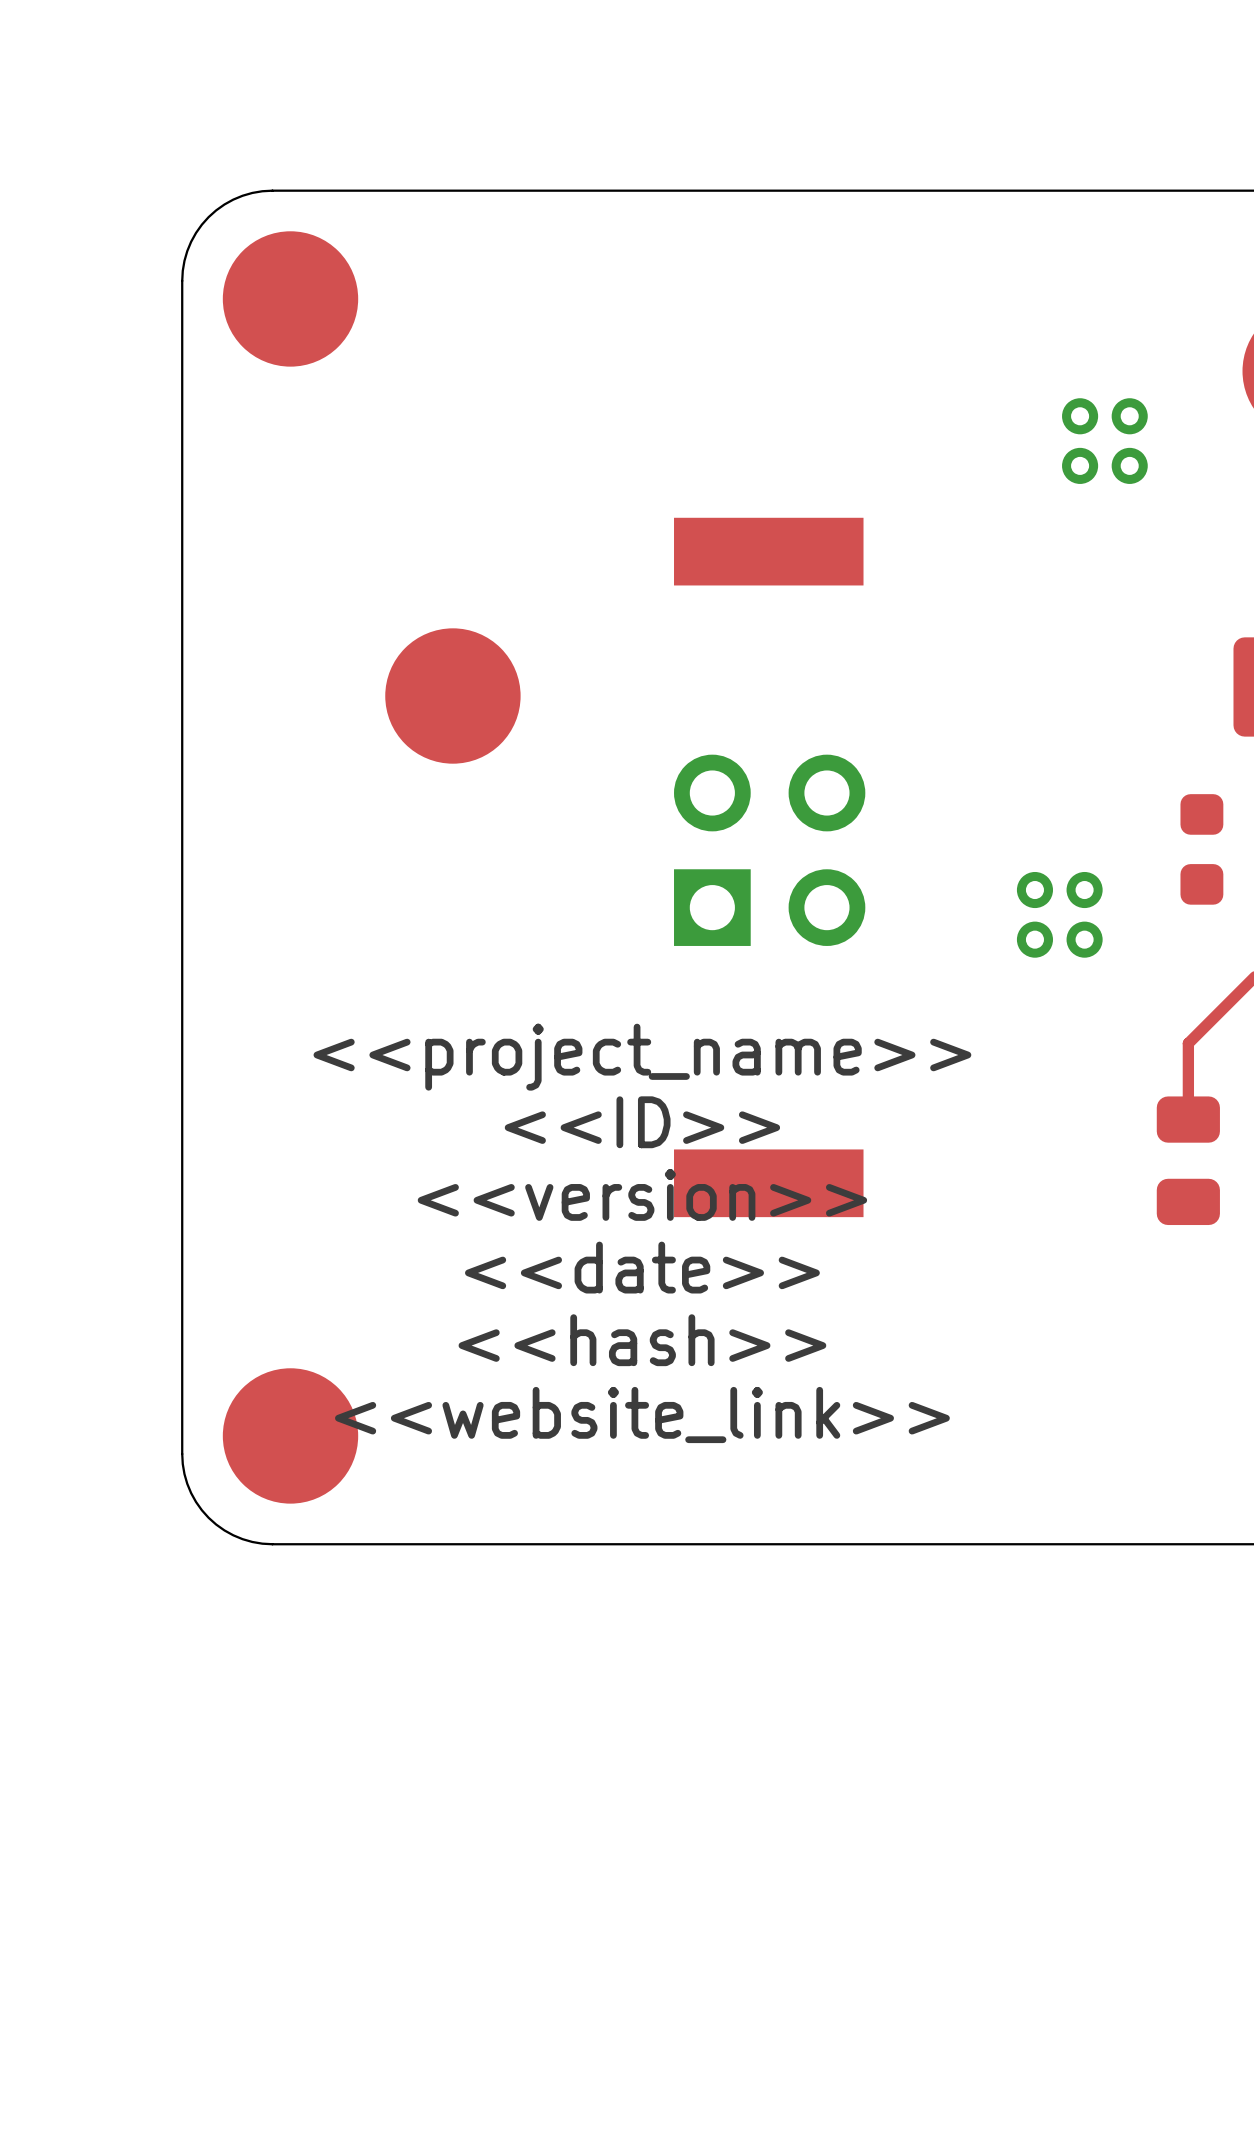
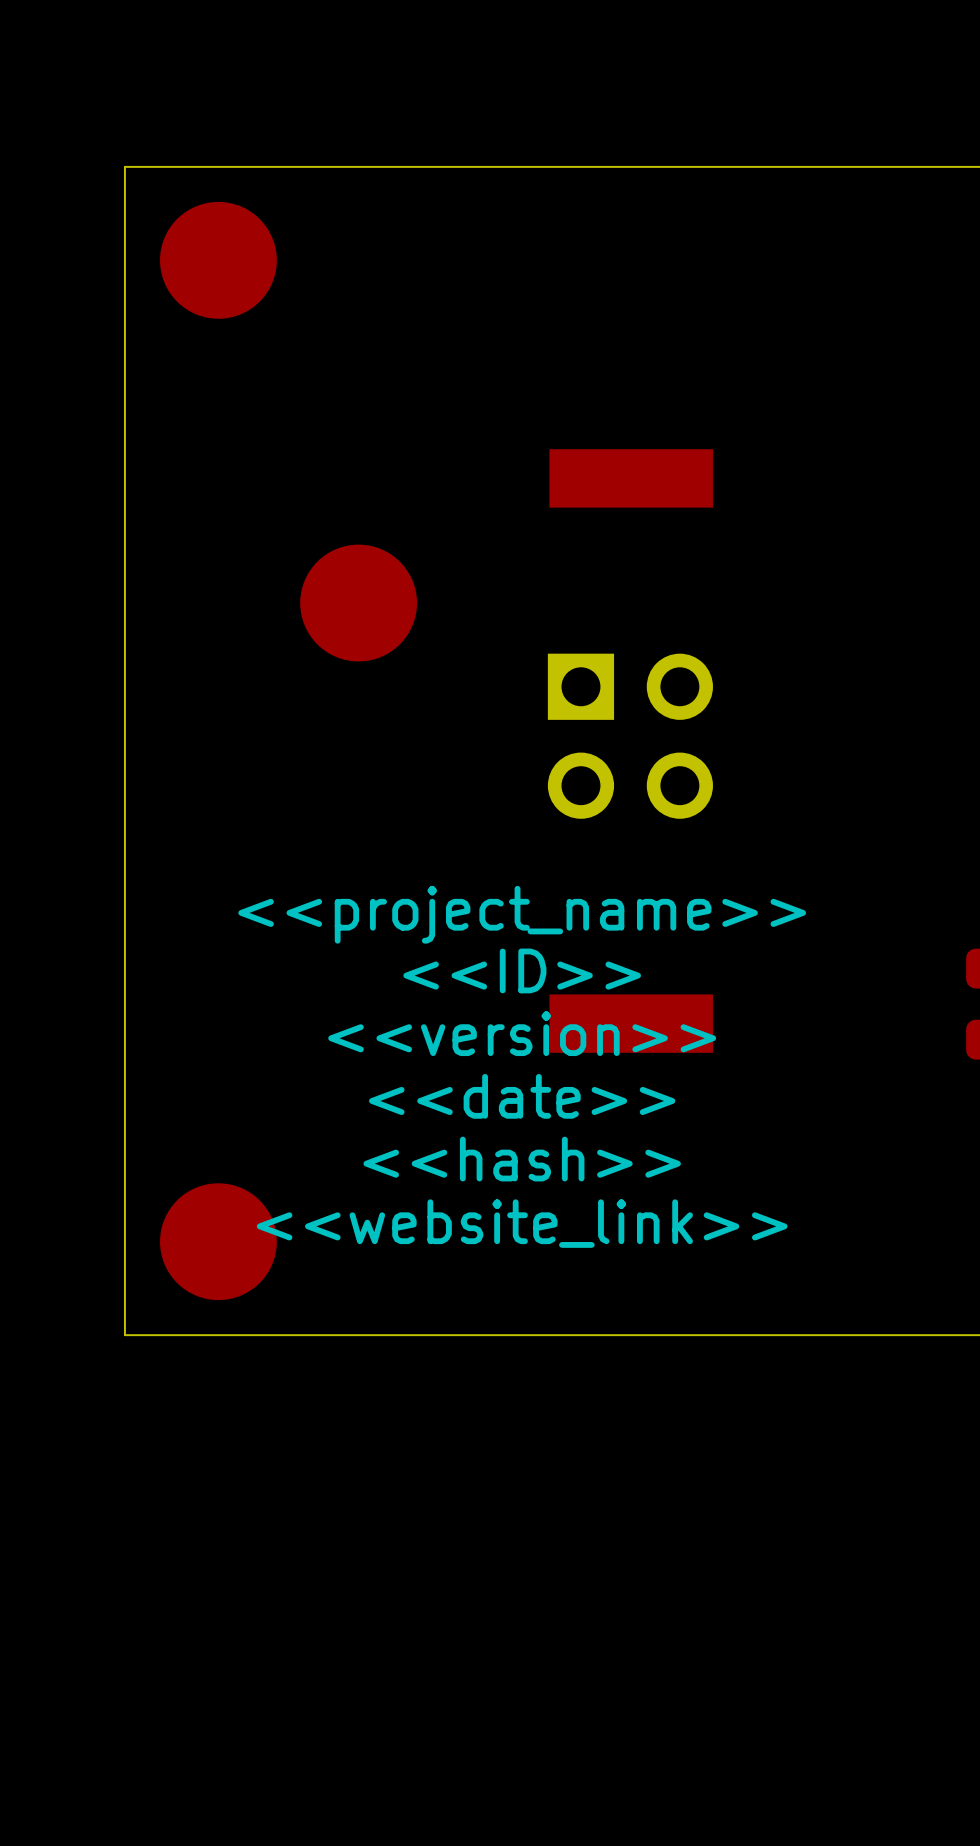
board edge: (272, 190) (252, 192) (233, 199) (208, 217) (191, 241) (184, 260) (182, 280) -> (202, 166) (124, 166) (124, 244)
via: (1080, 416) -> none
via: (1129, 416) -> none
via: (1080, 465) -> none
via: (1129, 465) -> none
part rotation: 0° (769, 850) -> 90° clockwise (630, 736)
via: (1034, 890) -> none
via: (1084, 890) -> none
via: (1034, 939) -> none
via: (1084, 939) -> none
board edge: (182, 1454) (187, 1483) (196, 1502) (208, 1517) (233, 1535) (252, 1541) (272, 1544) -> (124, 1257) (124, 1335) (202, 1335)

